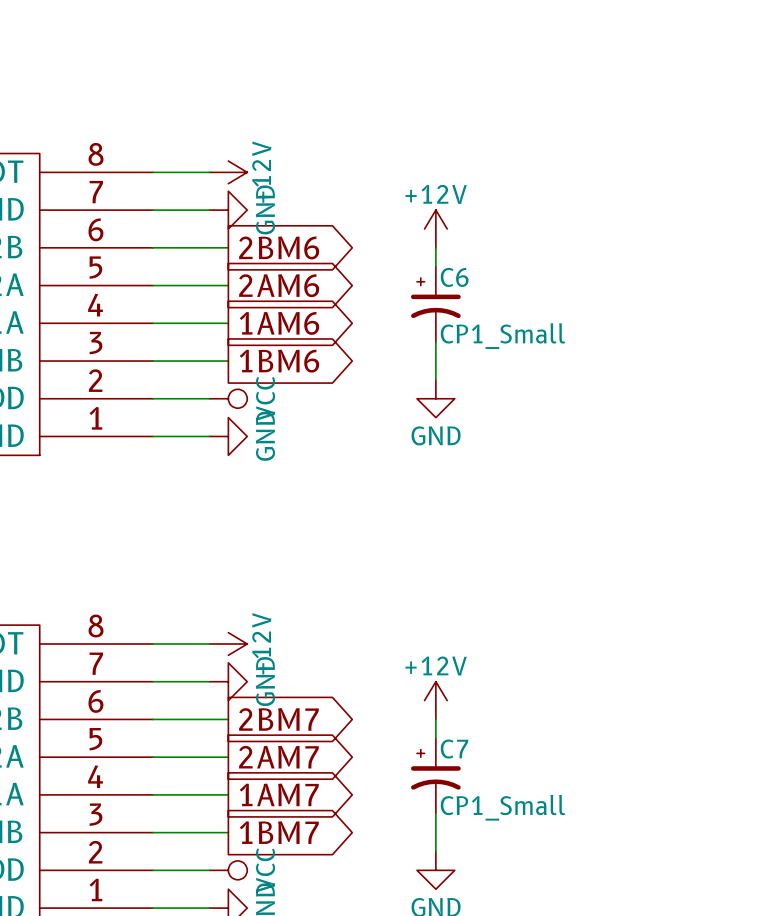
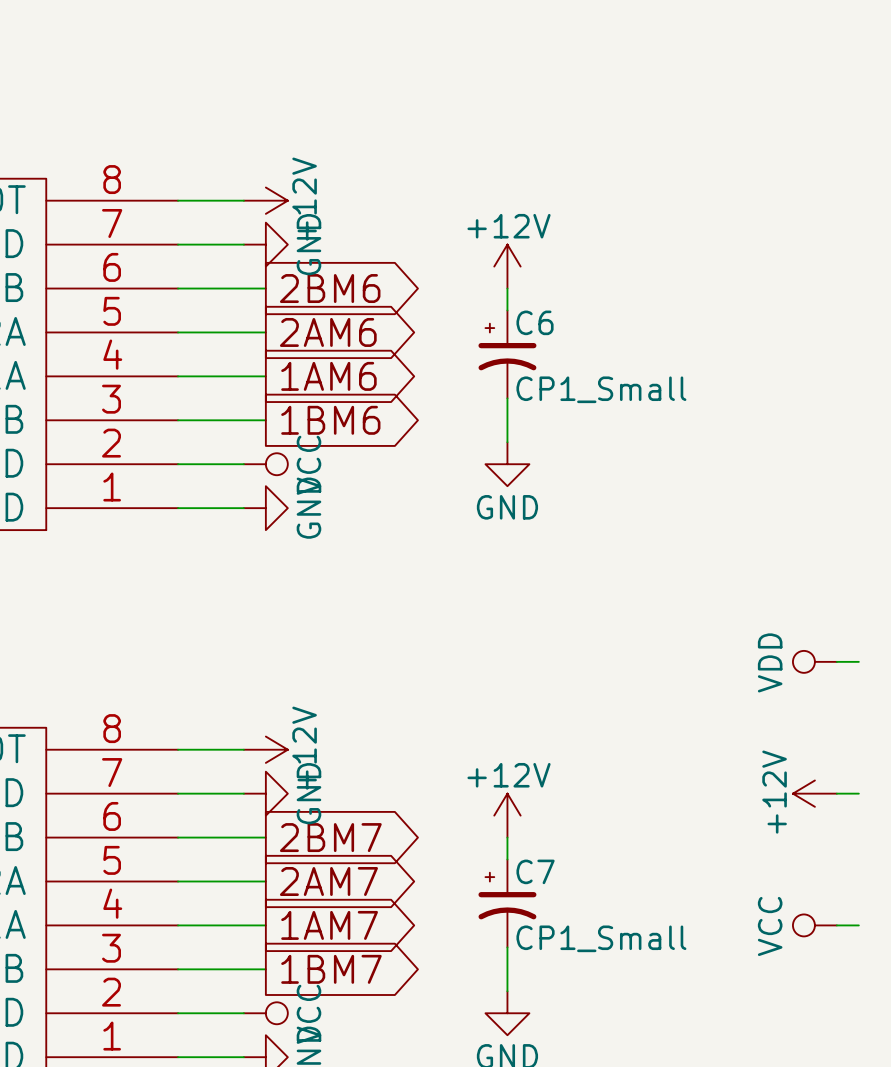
power symbol: none -> VDD (814, 661)
wire: none -> (836, 661) (858, 661)
power symbol: none -> +12V (814, 793)
wire: none -> (836, 793) (858, 793)
power symbol: none -> VCC (814, 925)
wire: none -> (836, 925) (858, 925)

